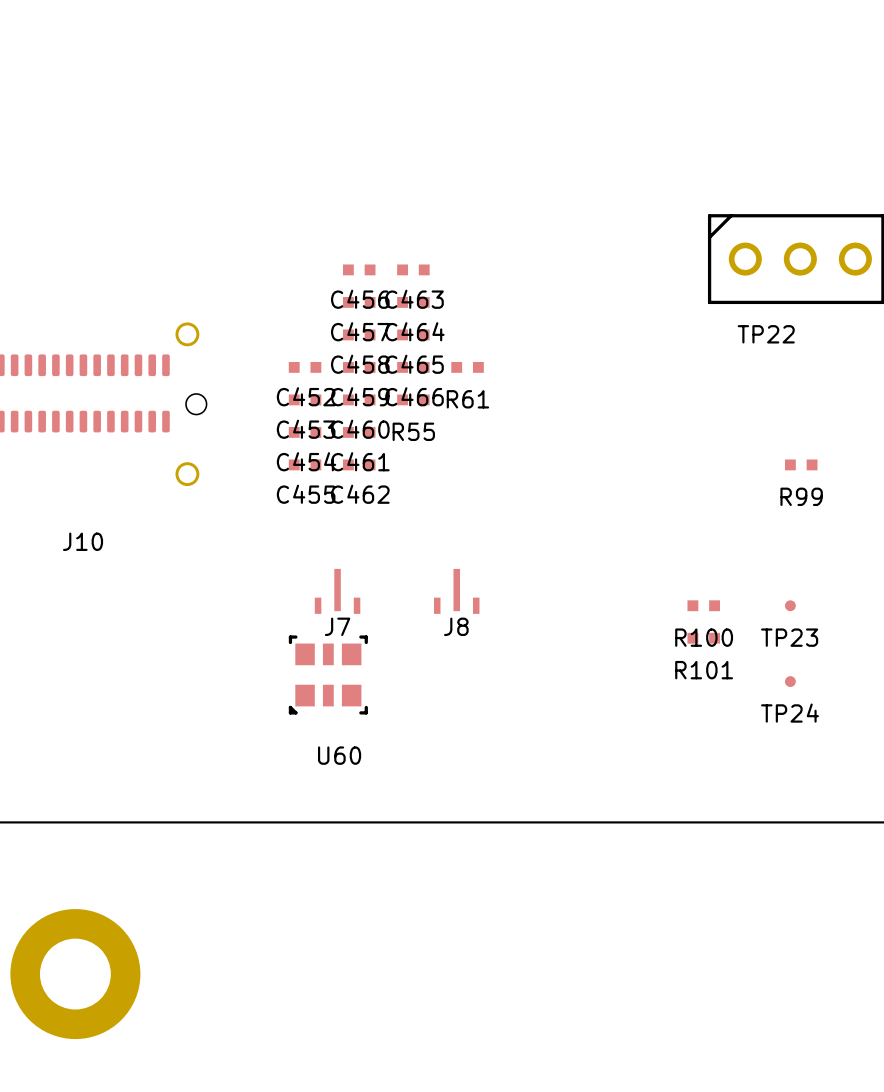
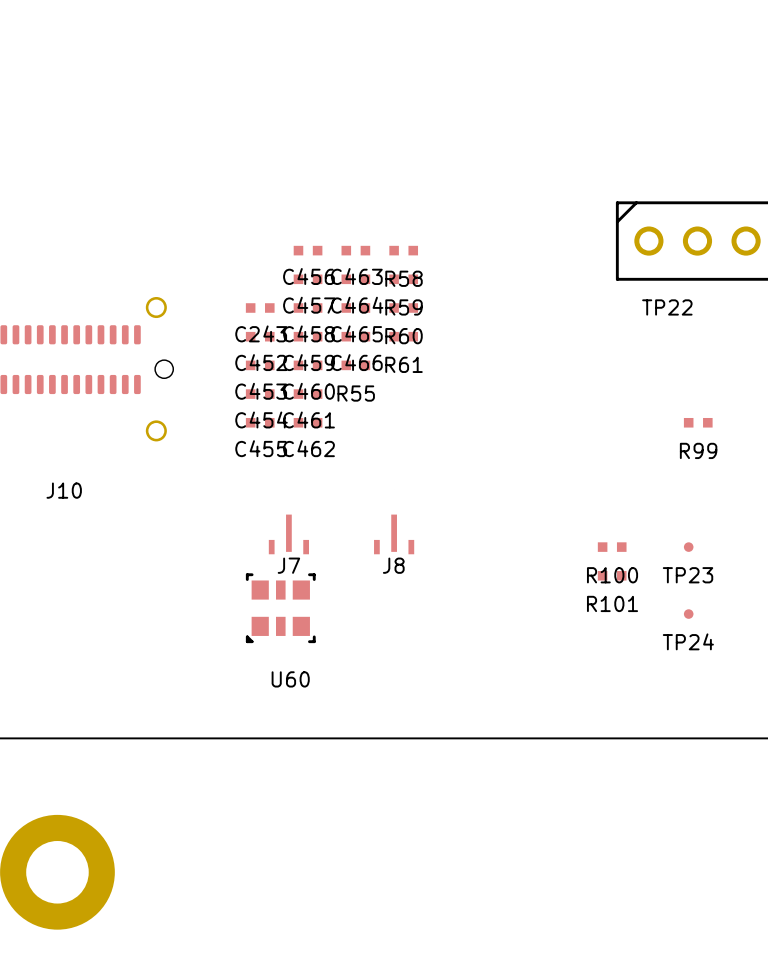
R58: none -> (403, 250)
R59: none -> (403, 279)
C243: none -> (260, 308)
R60: none -> (403, 308)

